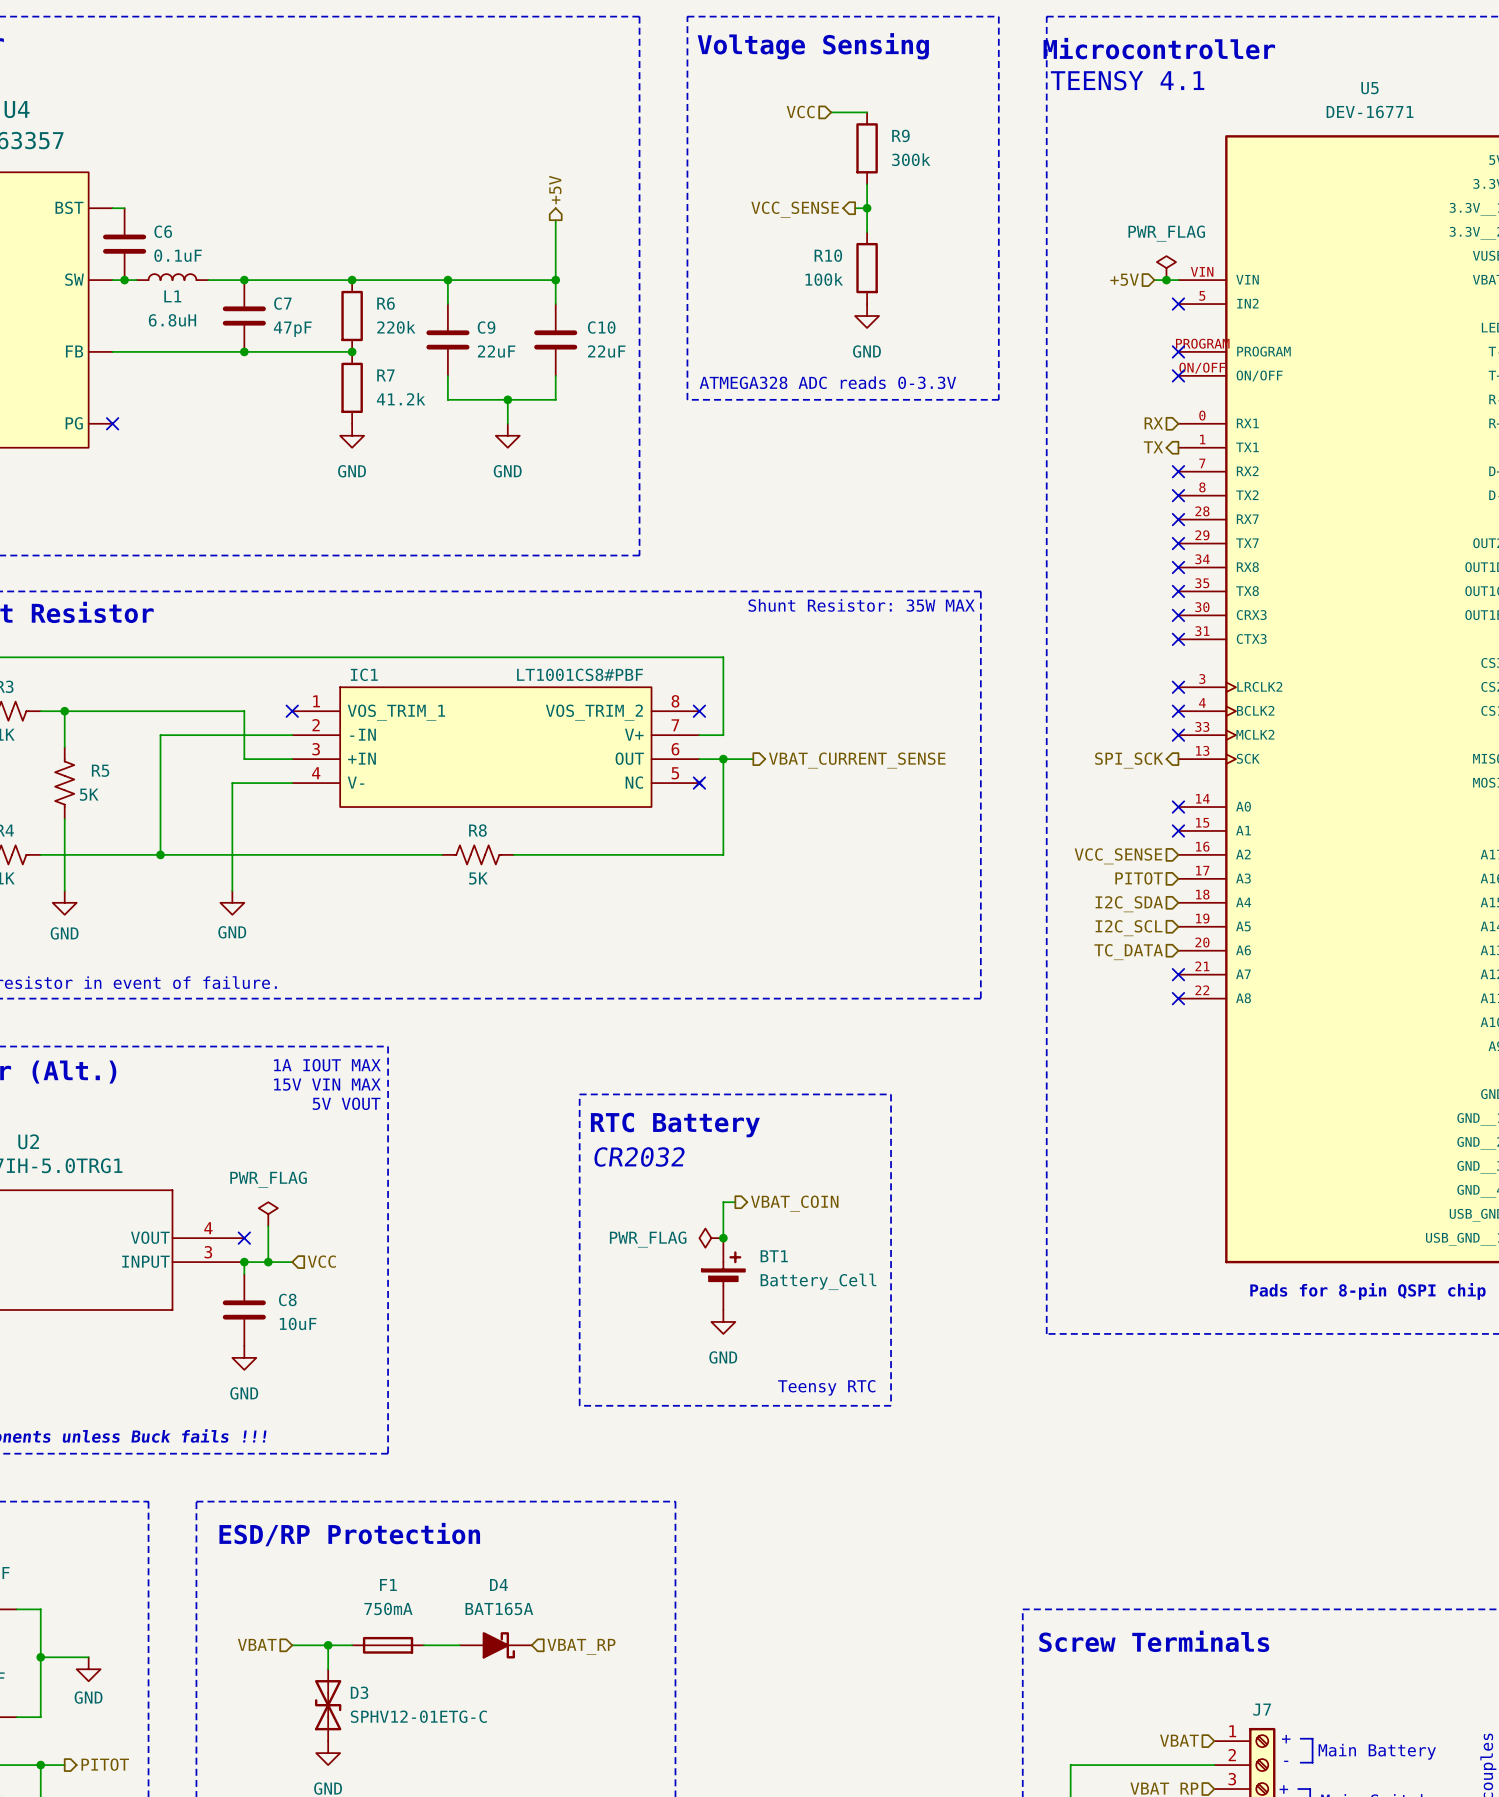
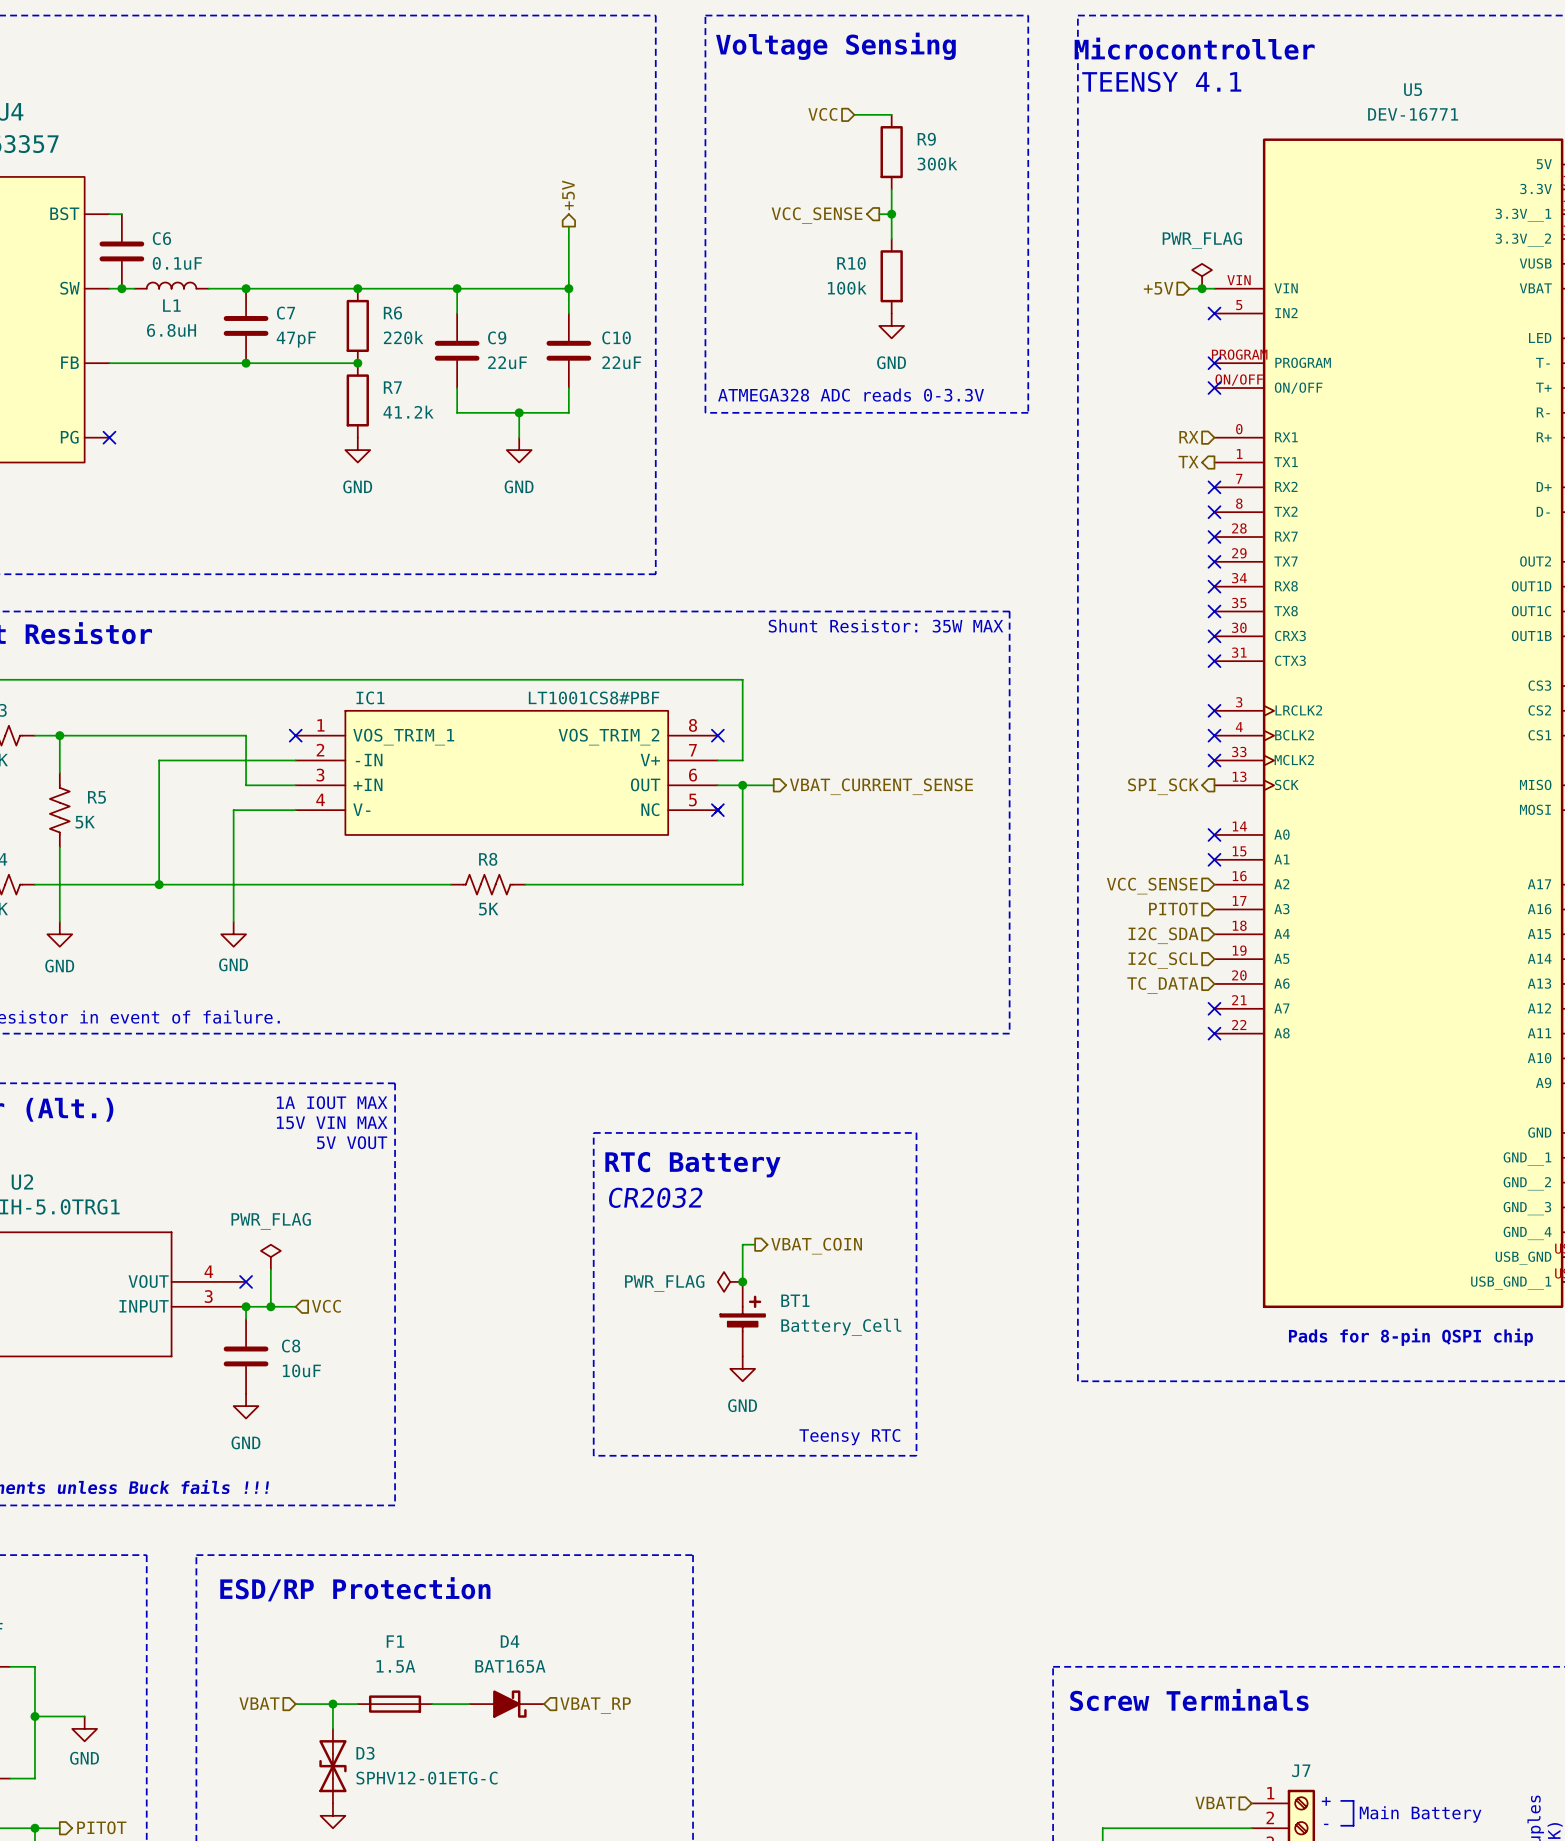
F1 value: 750mA (388, 1608) -> 1.5A (395, 1666)

